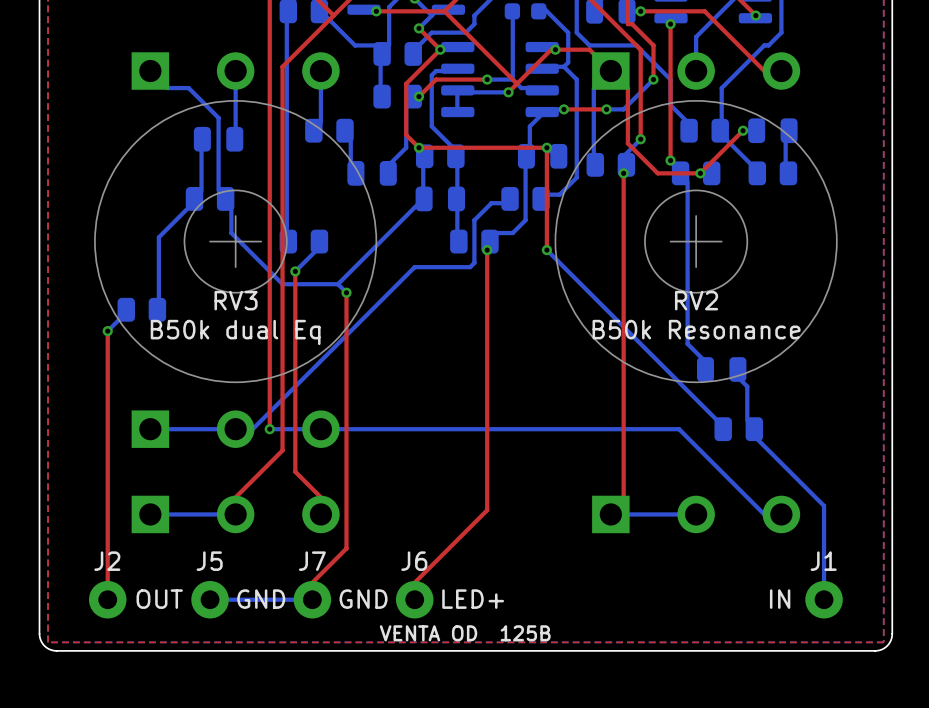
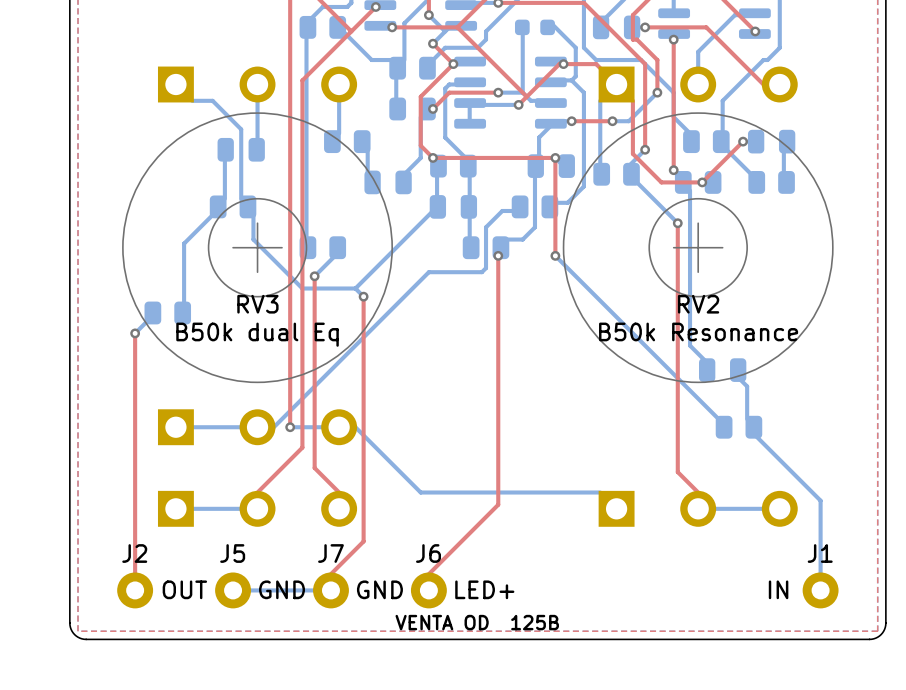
top track: (623, 173) (623, 497) -> none
via position: (623, 173) -> (677, 223)
bottom track: none -> (636, 182) (677, 223)
top track: none -> (677, 223) (677, 472) (698, 492)
bottom track: (337, 429) (679, 429) (764, 514) -> (355, 427) (420, 492) (600, 492)
bottom track: (627, 514) (679, 514) -> (714, 508) (763, 508)

